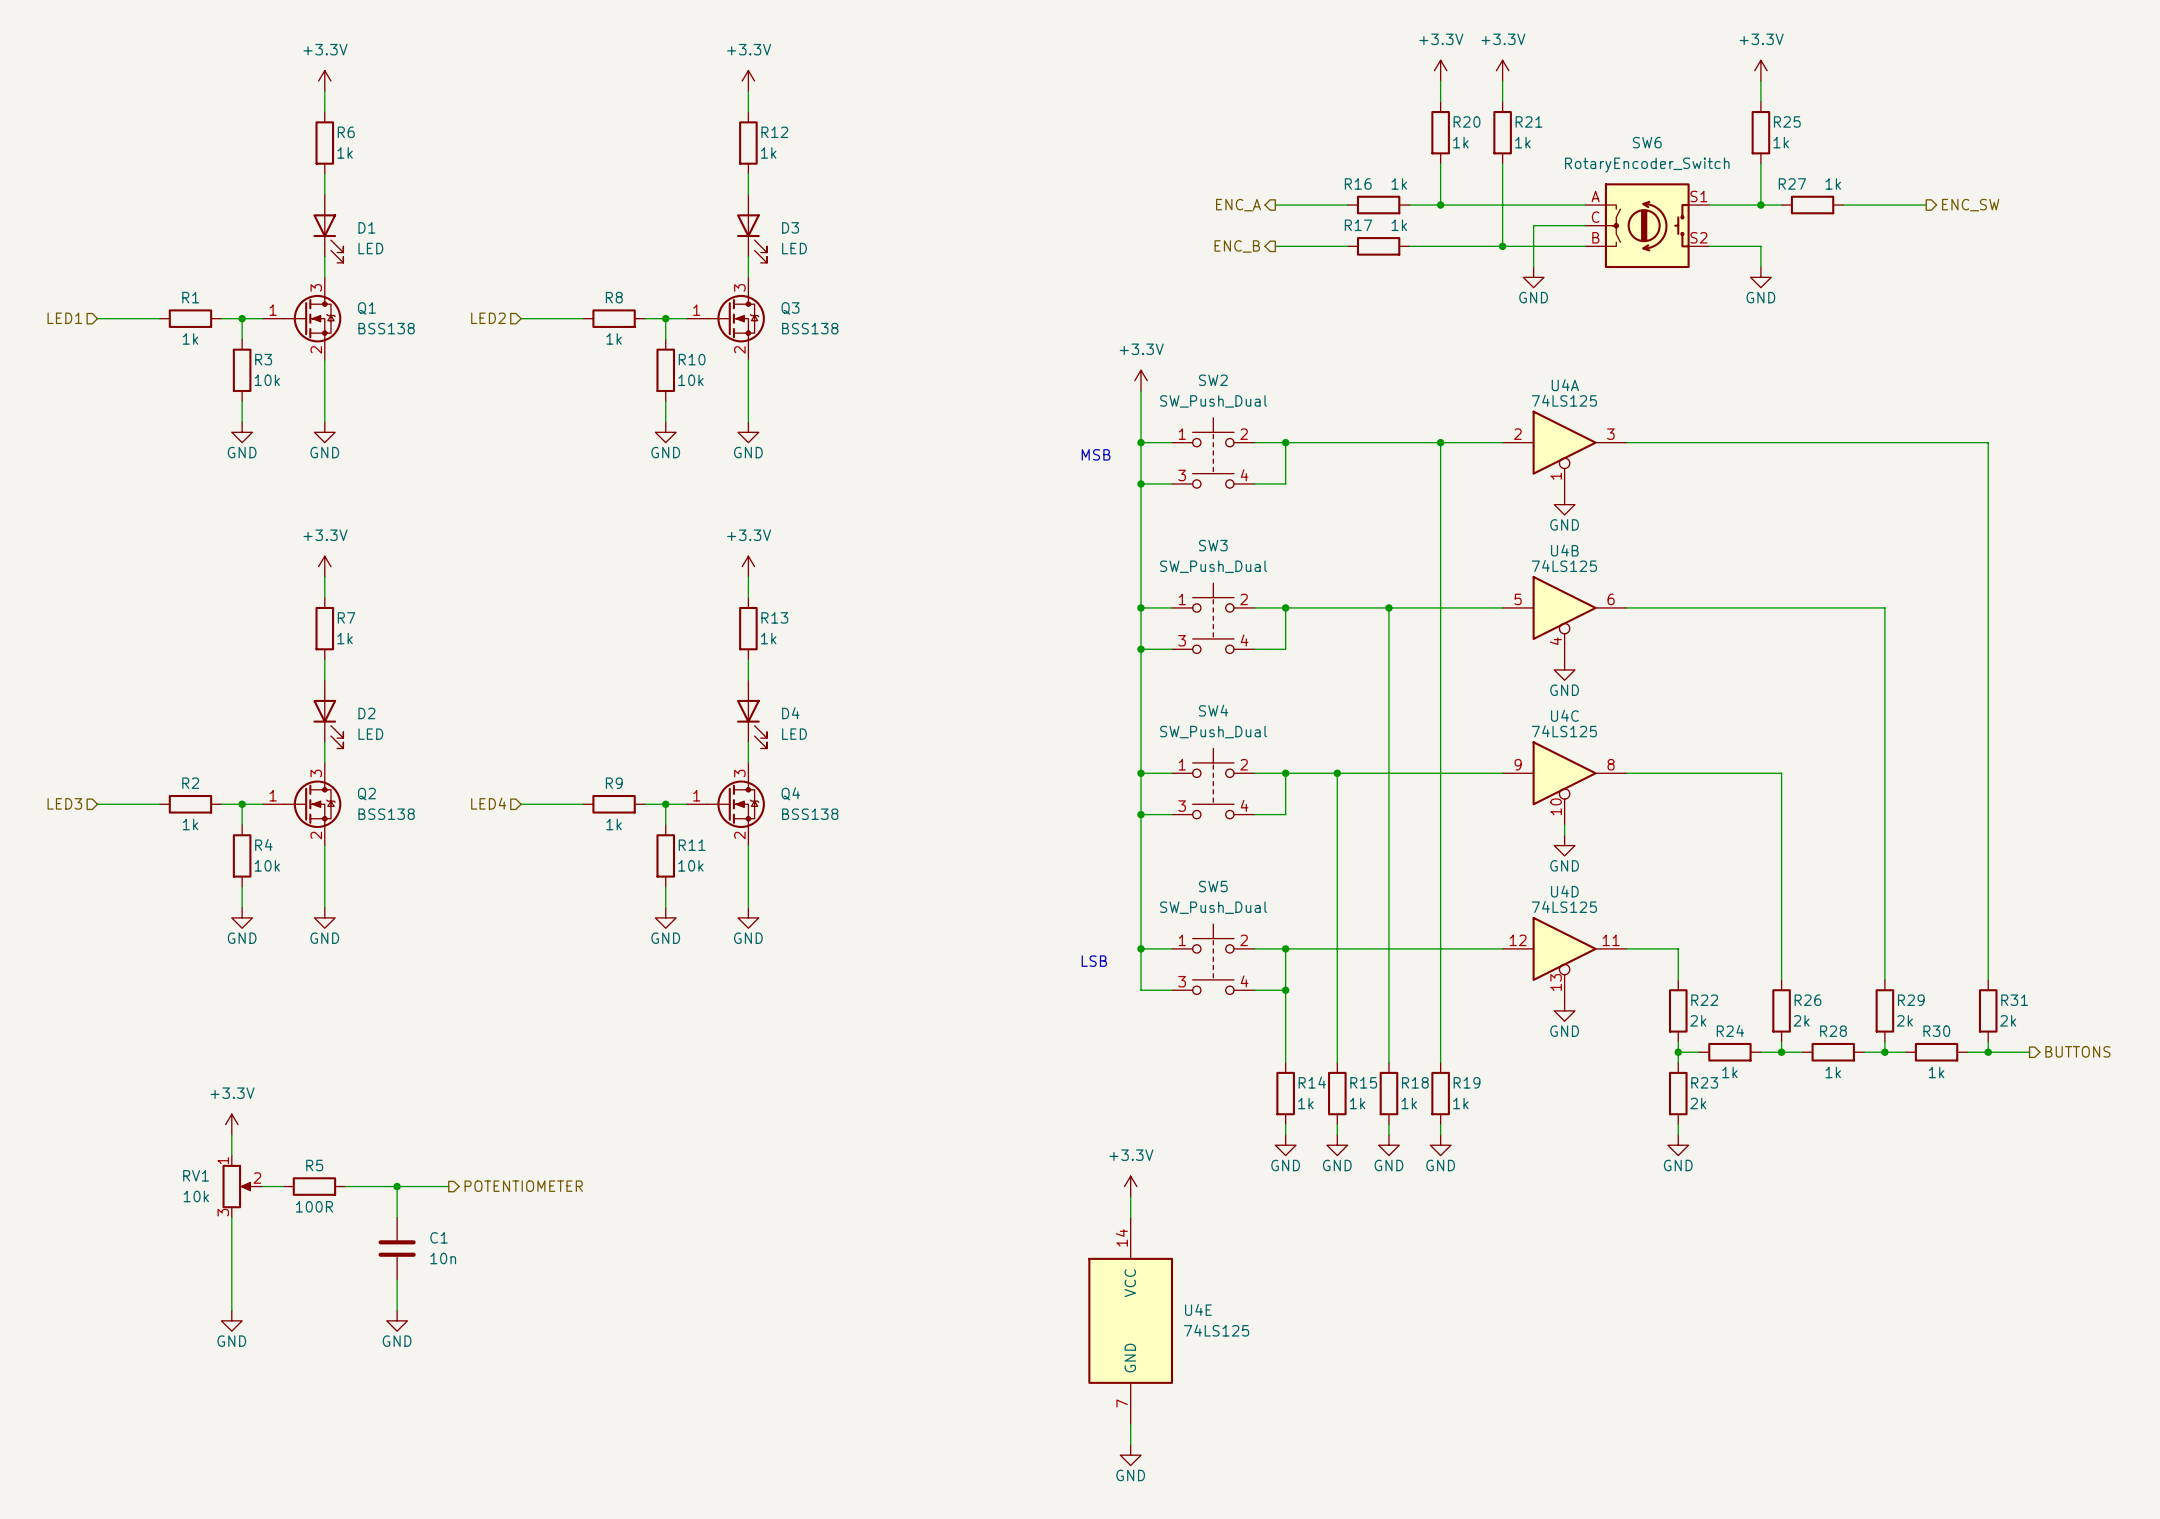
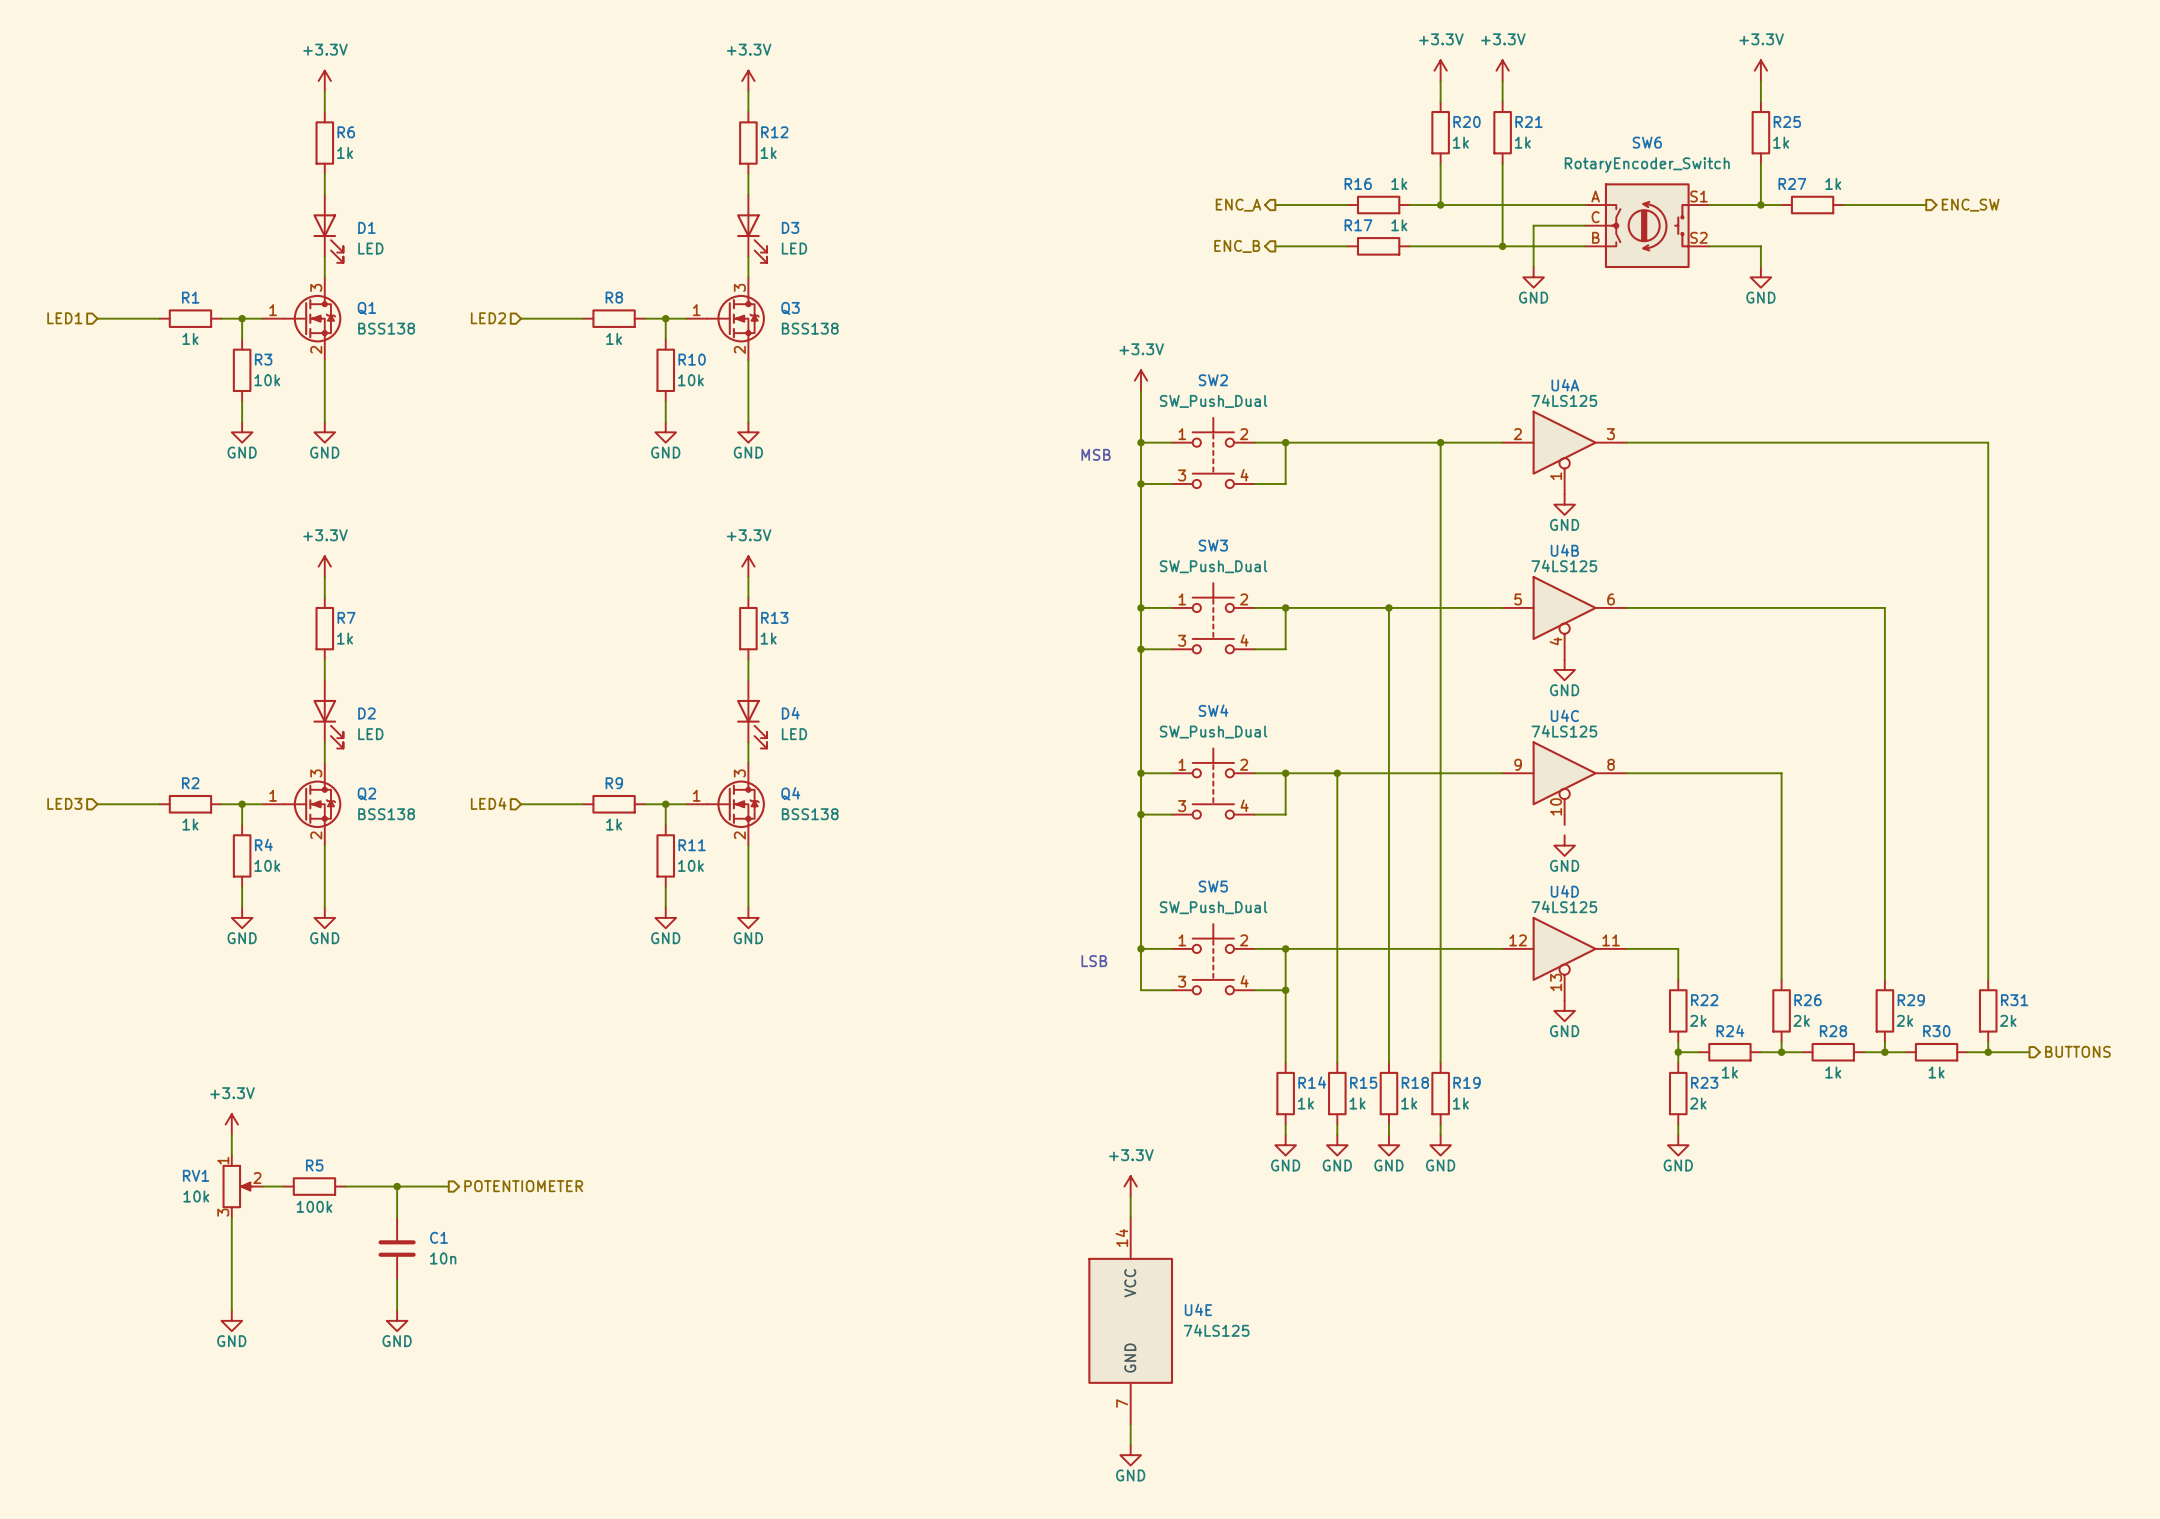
wire: (1564, 824) (1564, 835) -> none
R5 value: 100R (314, 1206) -> 100k (314, 1206)

